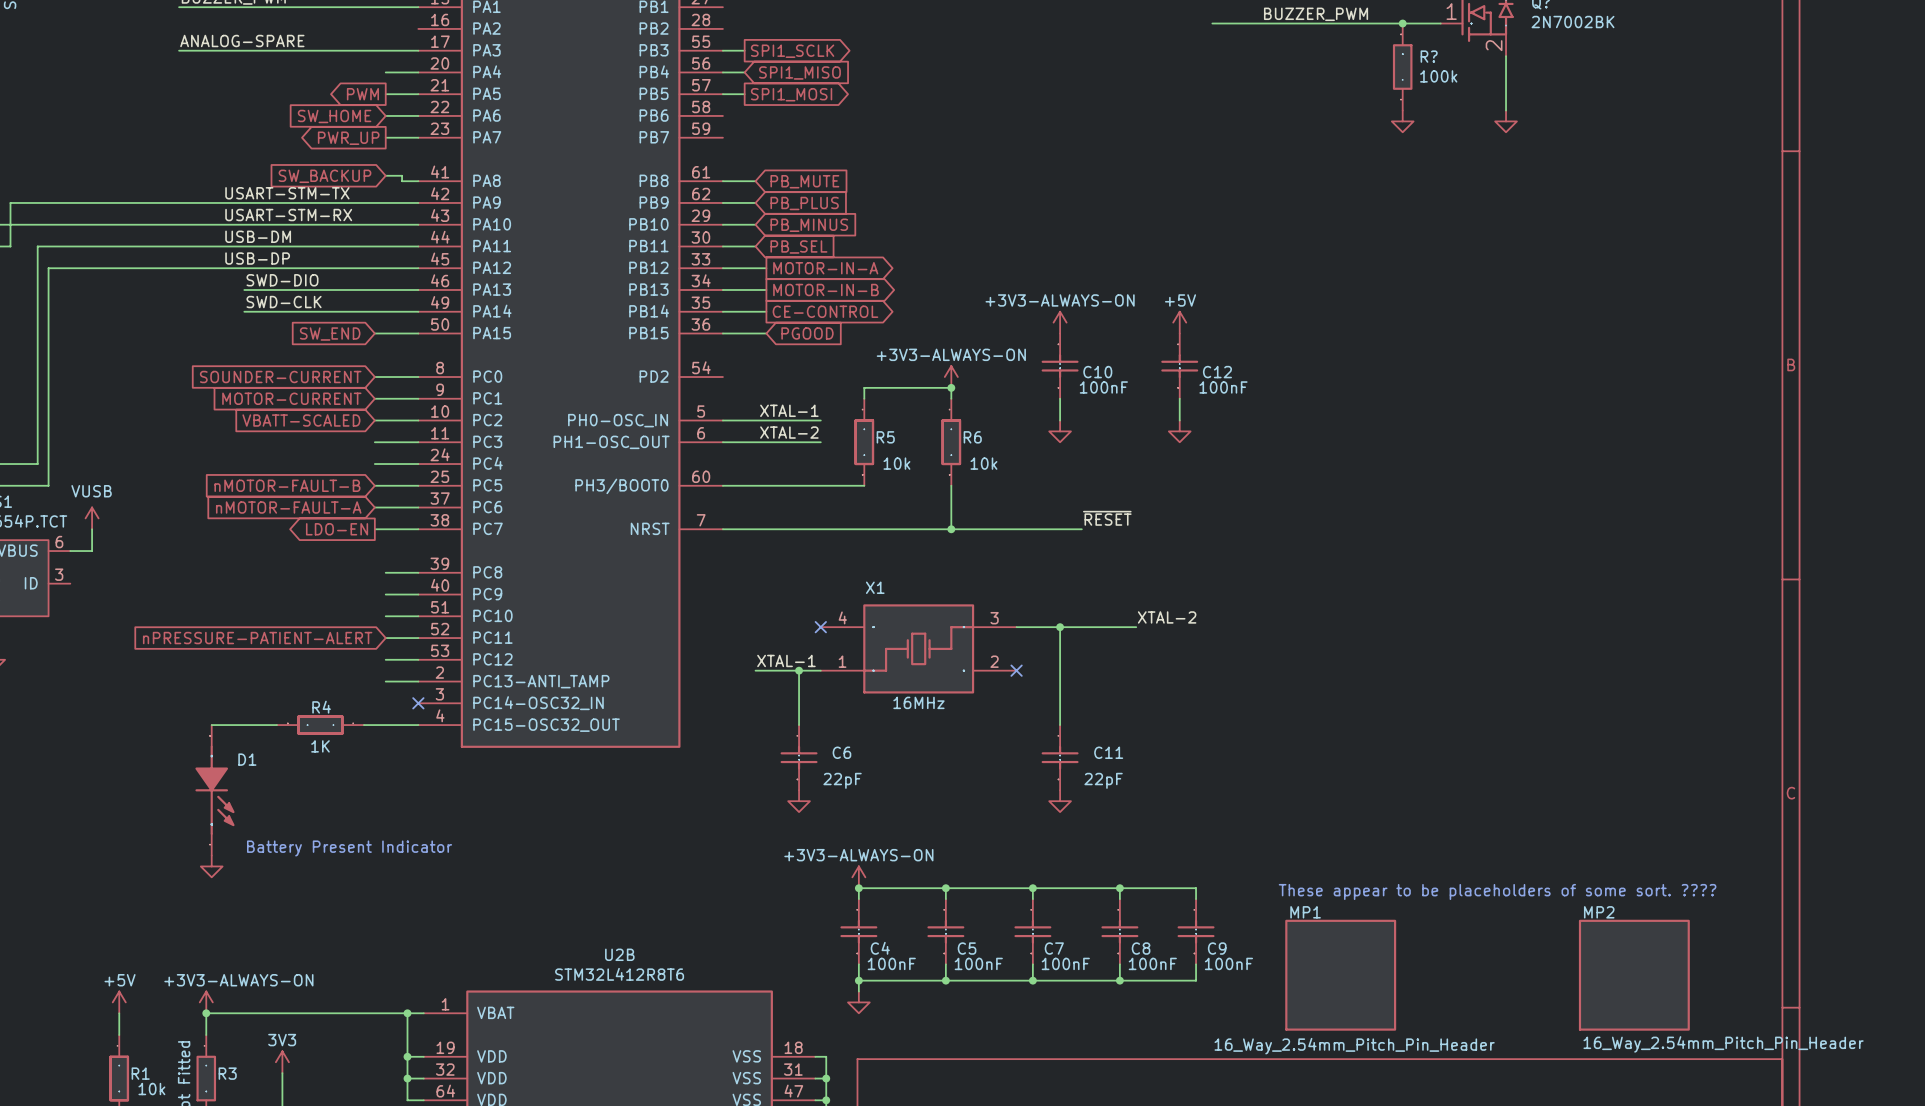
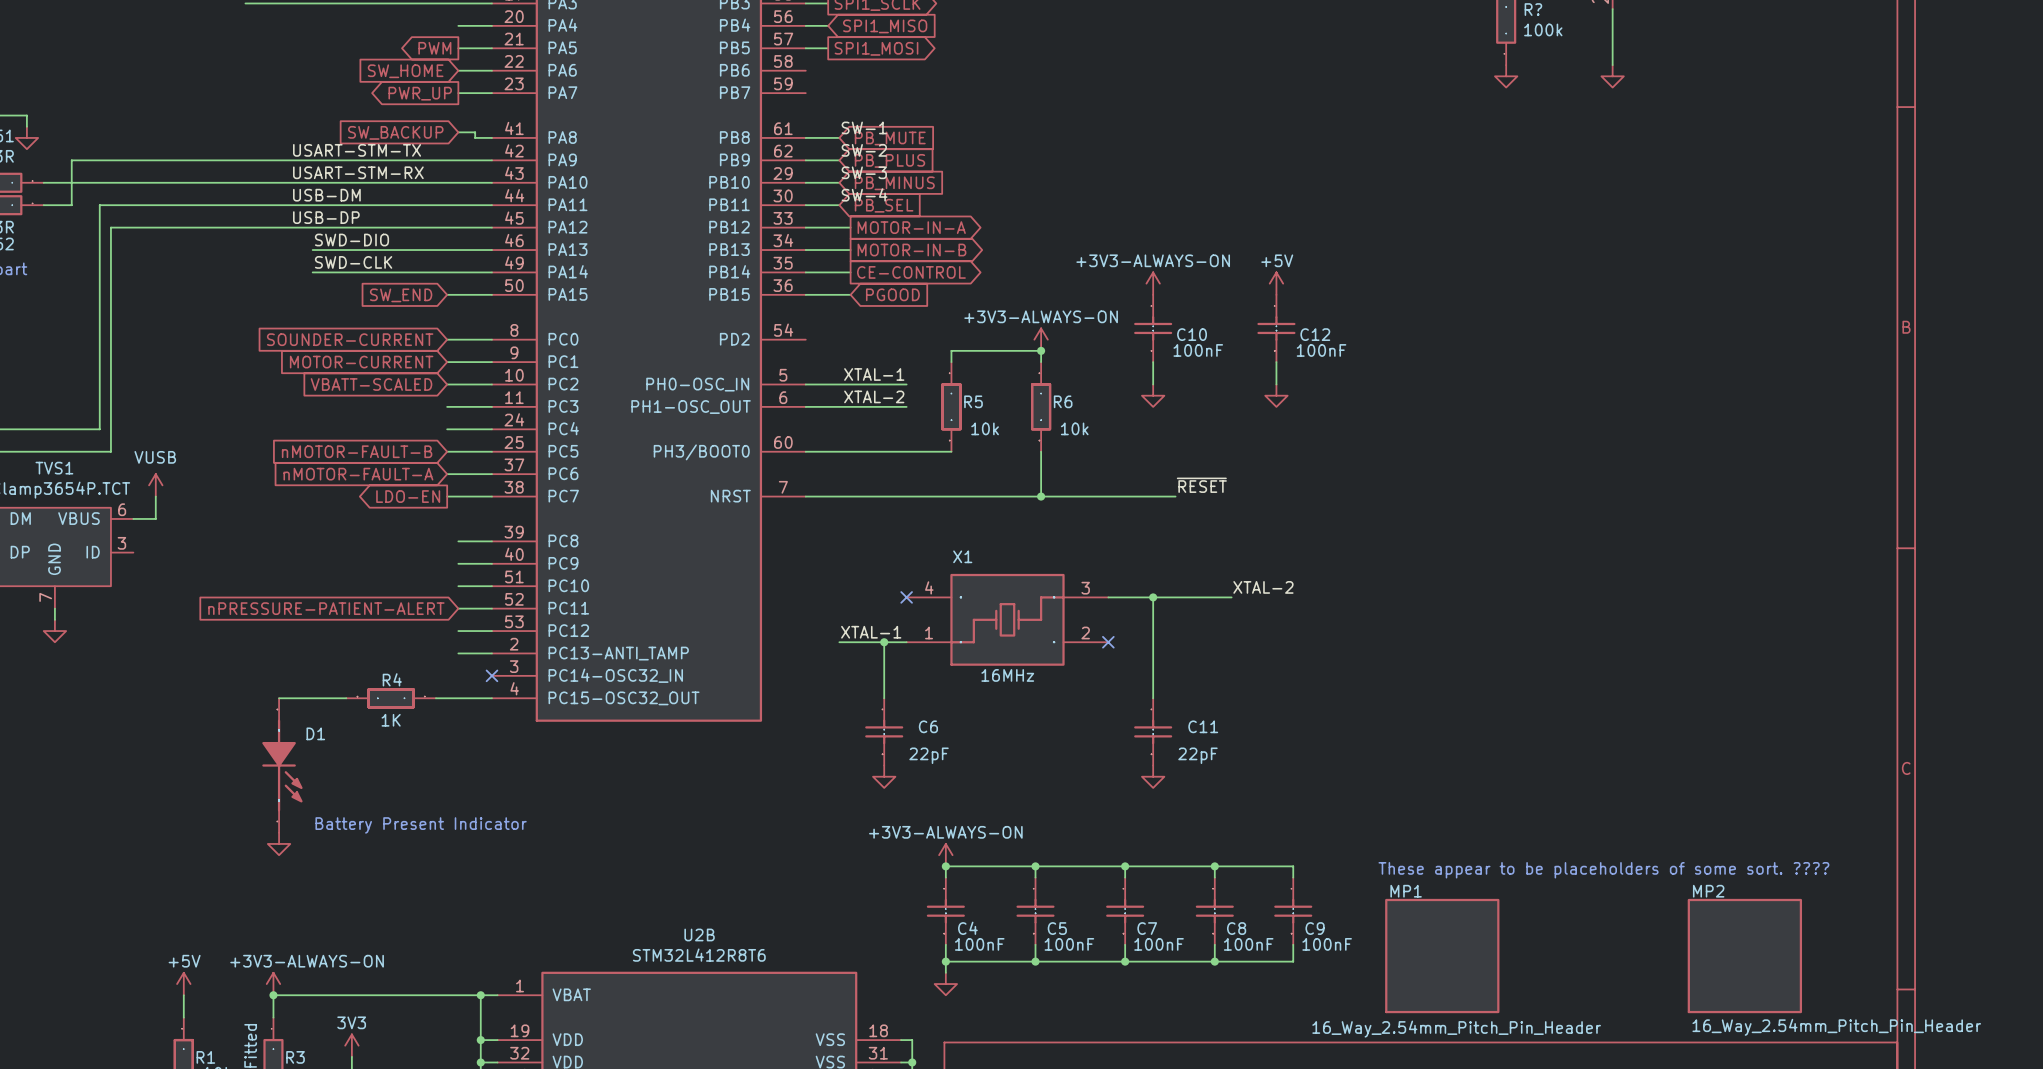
label: none -> SW-1 (864, 127)
label: none -> SW-2 (864, 150)
label: none -> SW-3 (864, 172)
label: none -> SW-4 (864, 194)

